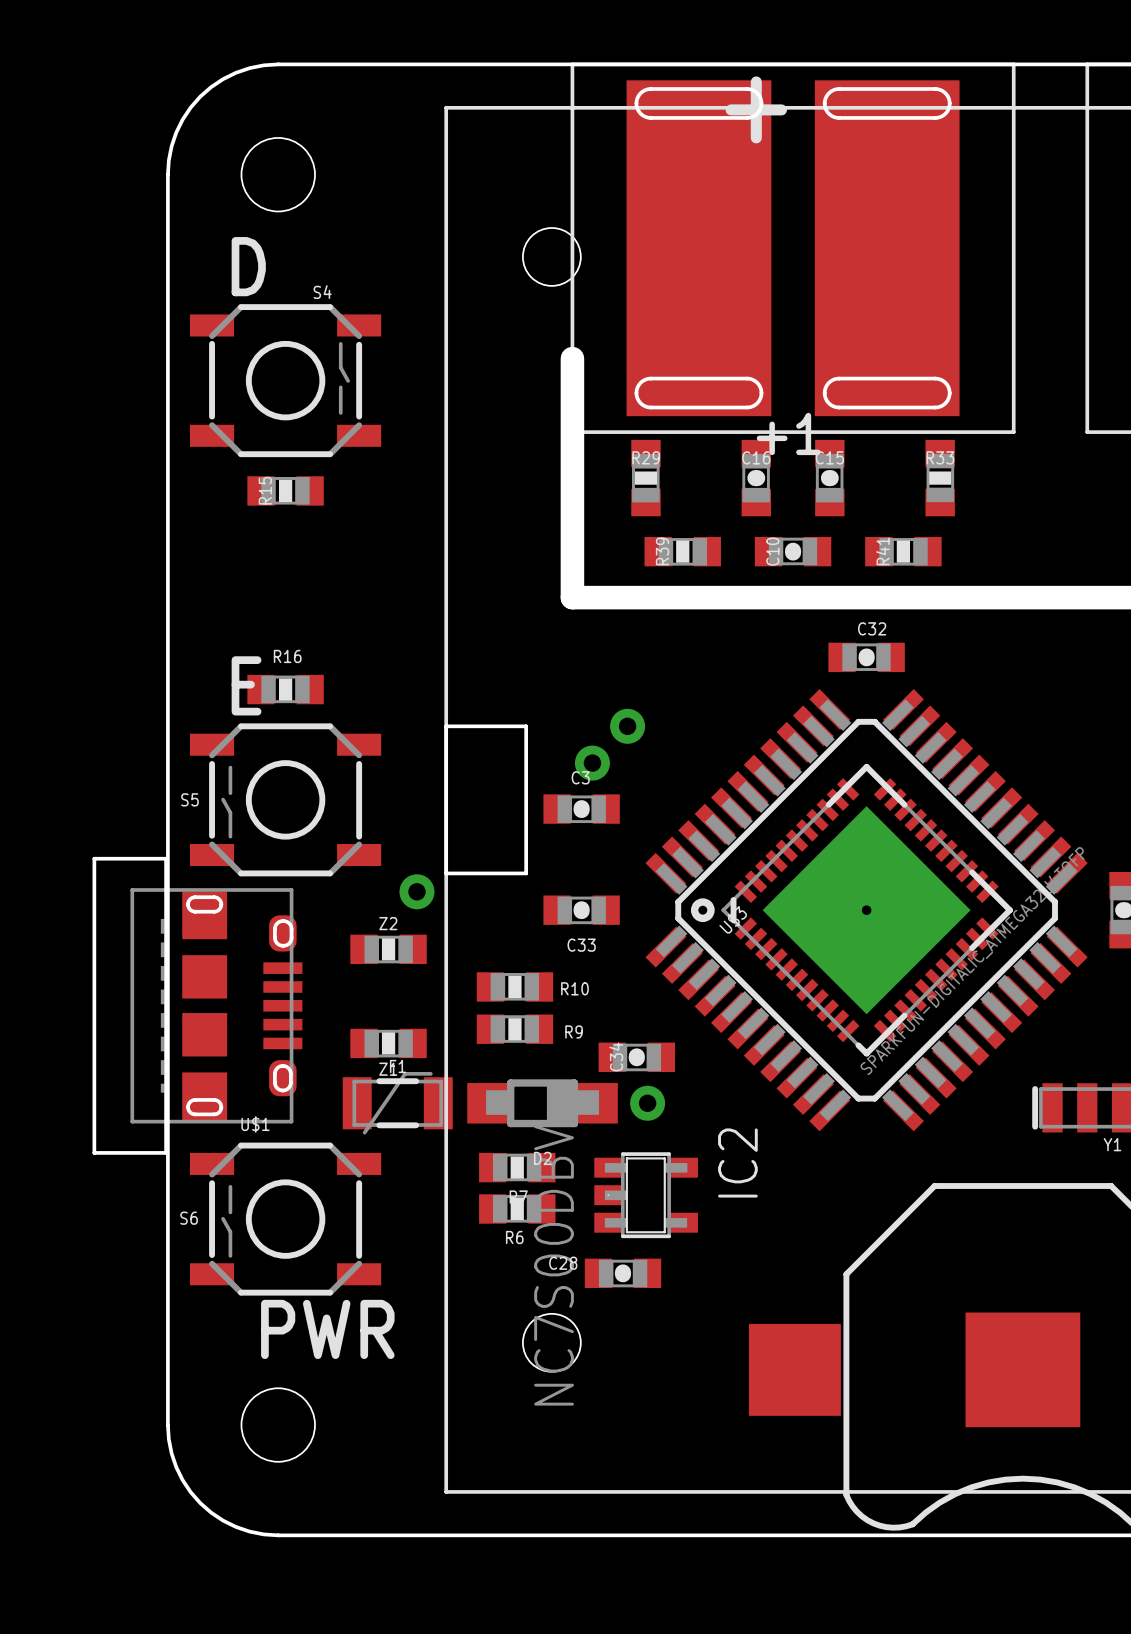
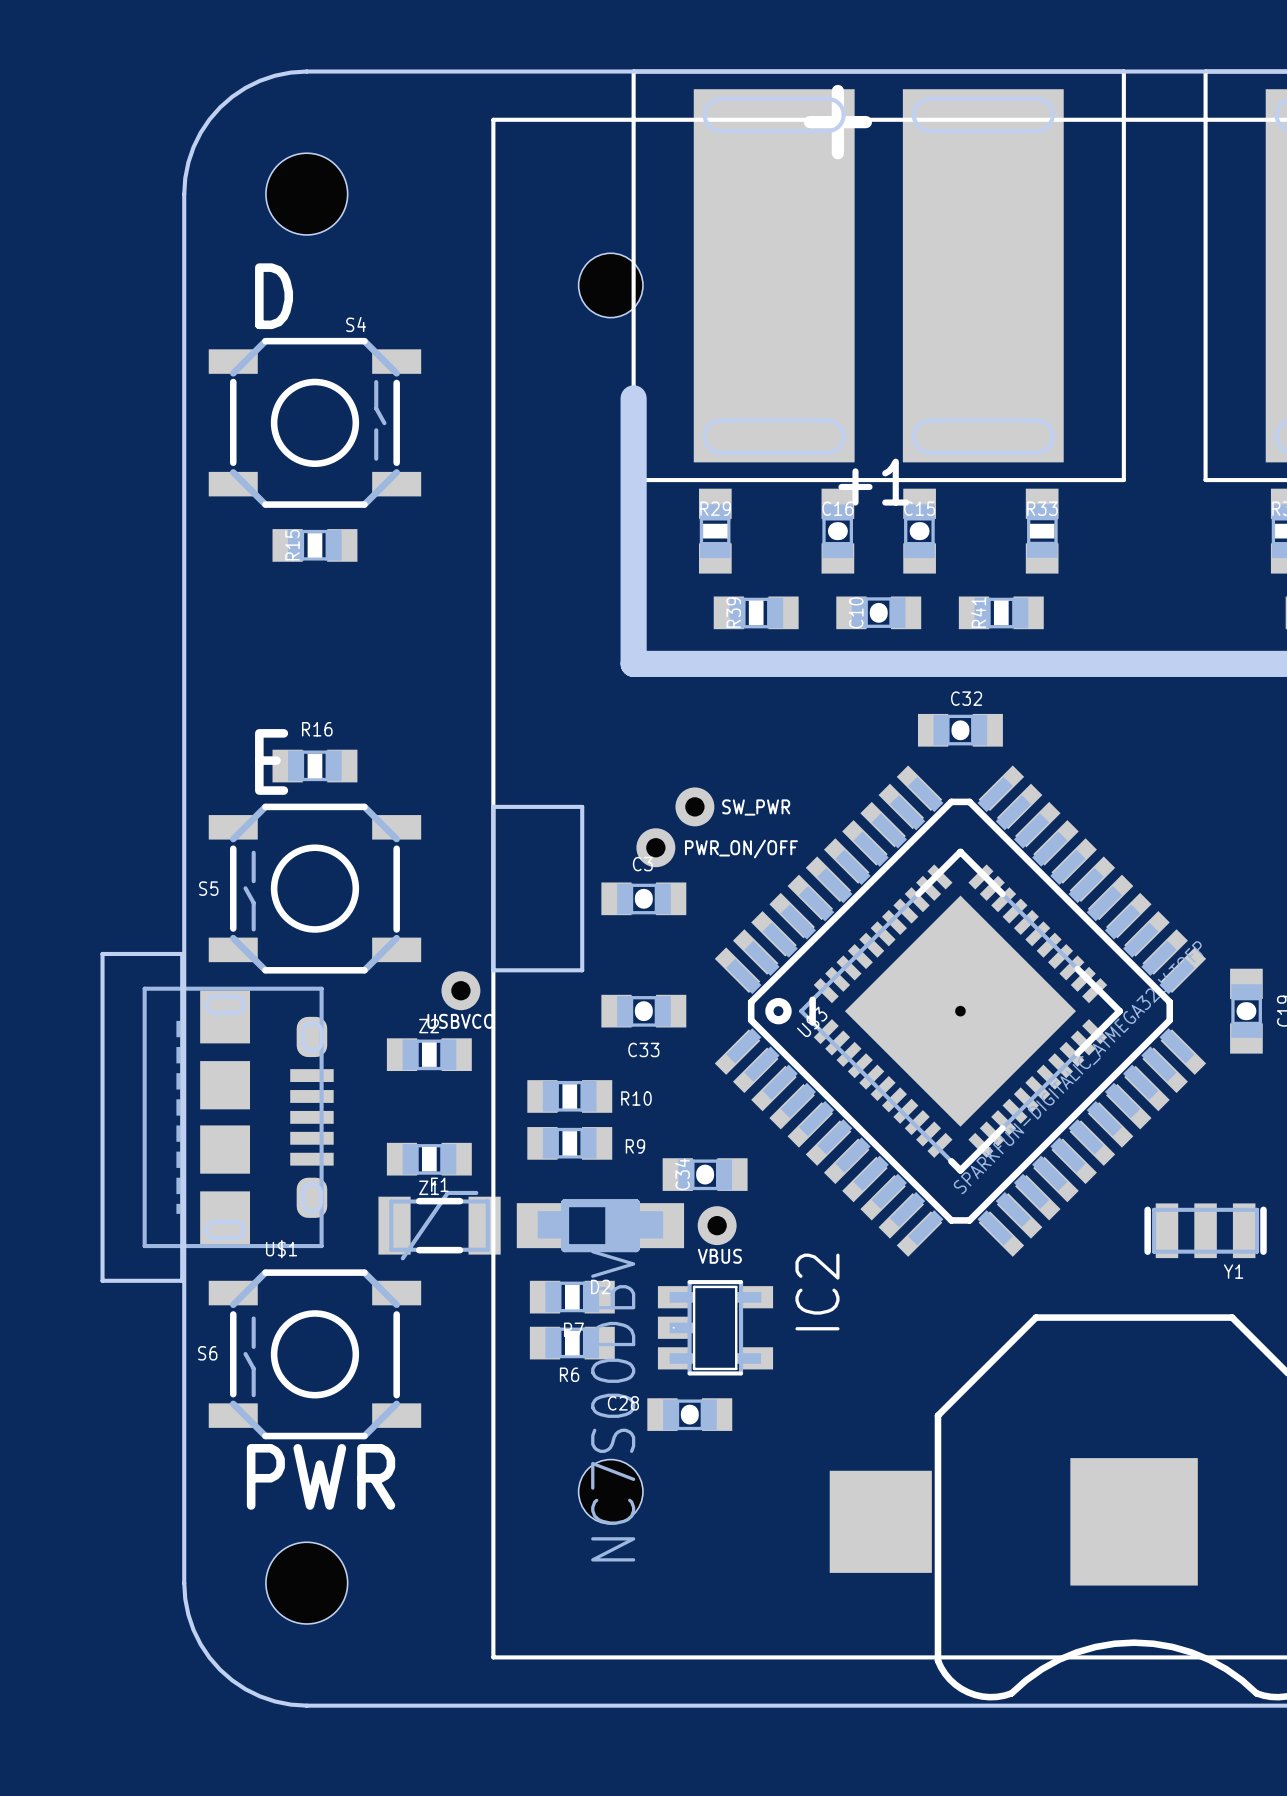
text: none -> SW_PWR (756, 807)
text: none -> PWR_ON/OFF (741, 848)
text: none -> USBVCC (460, 1021)
text: none -> VBUS (719, 1256)
text position: PWR (327, 1329) -> PWR (321, 1476)

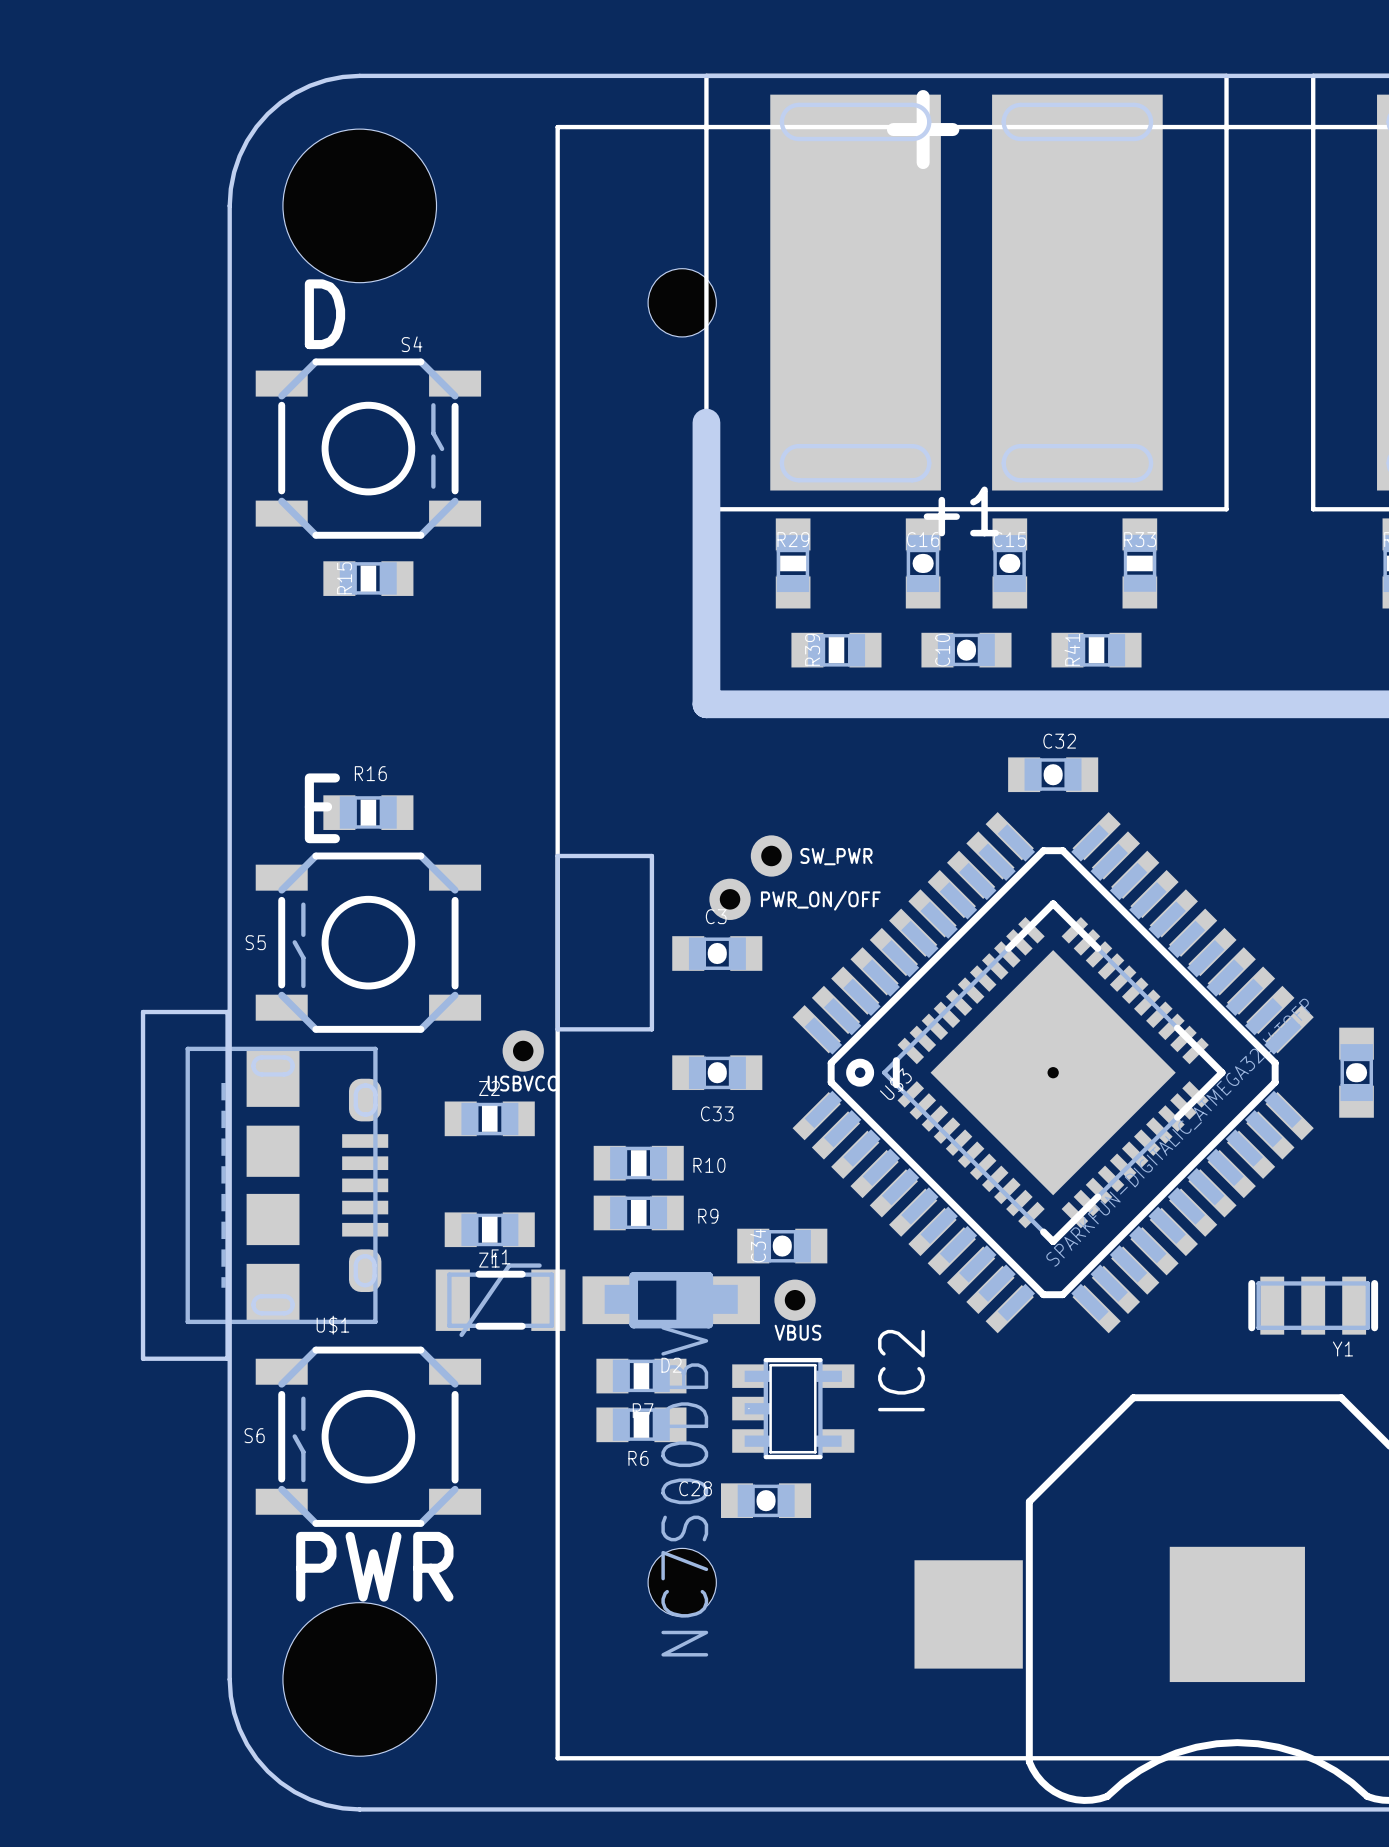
hole size: [265, 153, 348, 235] -> [282, 129, 437, 283]
hole size: [265, 1542, 348, 1624] -> [282, 1602, 437, 1757]

